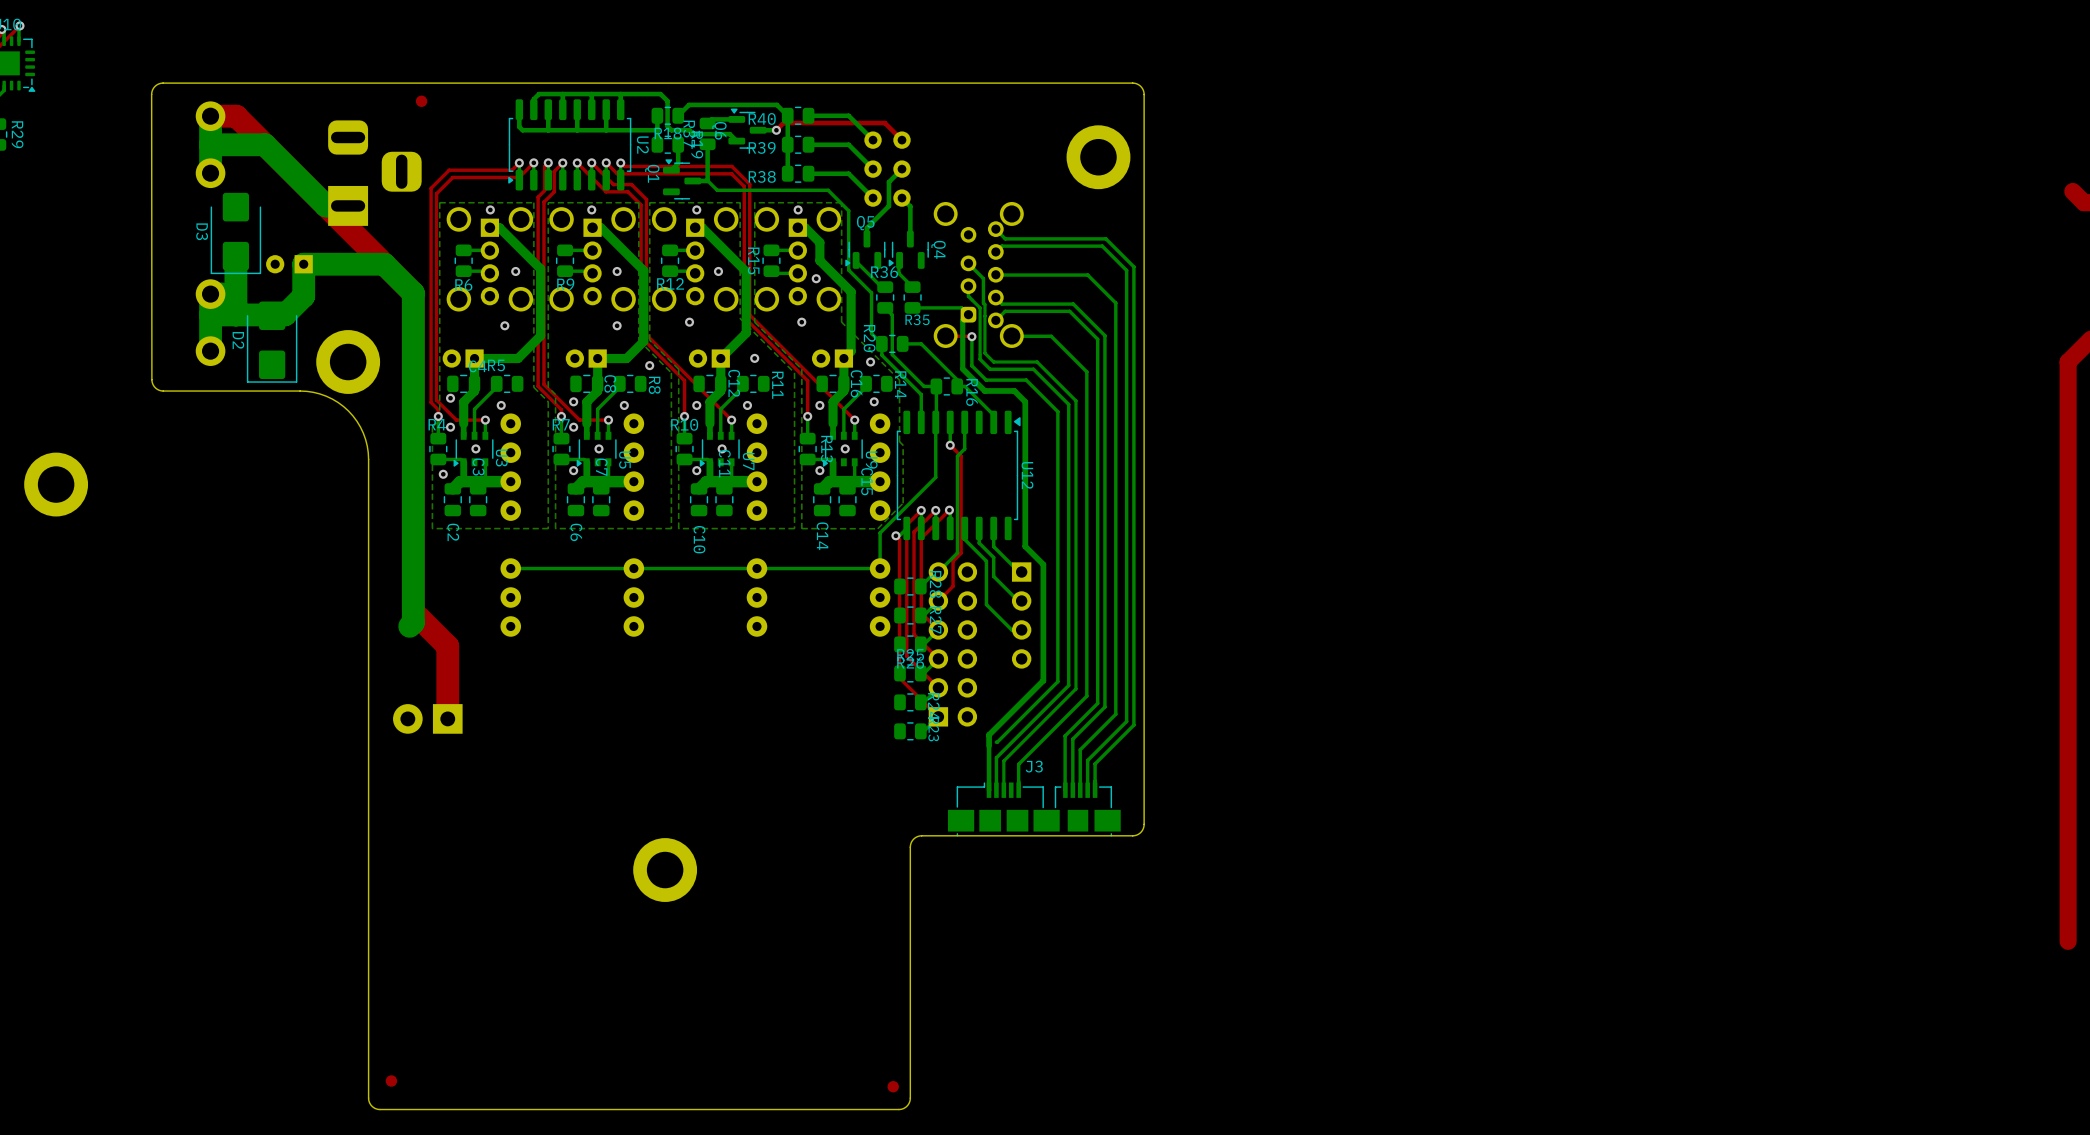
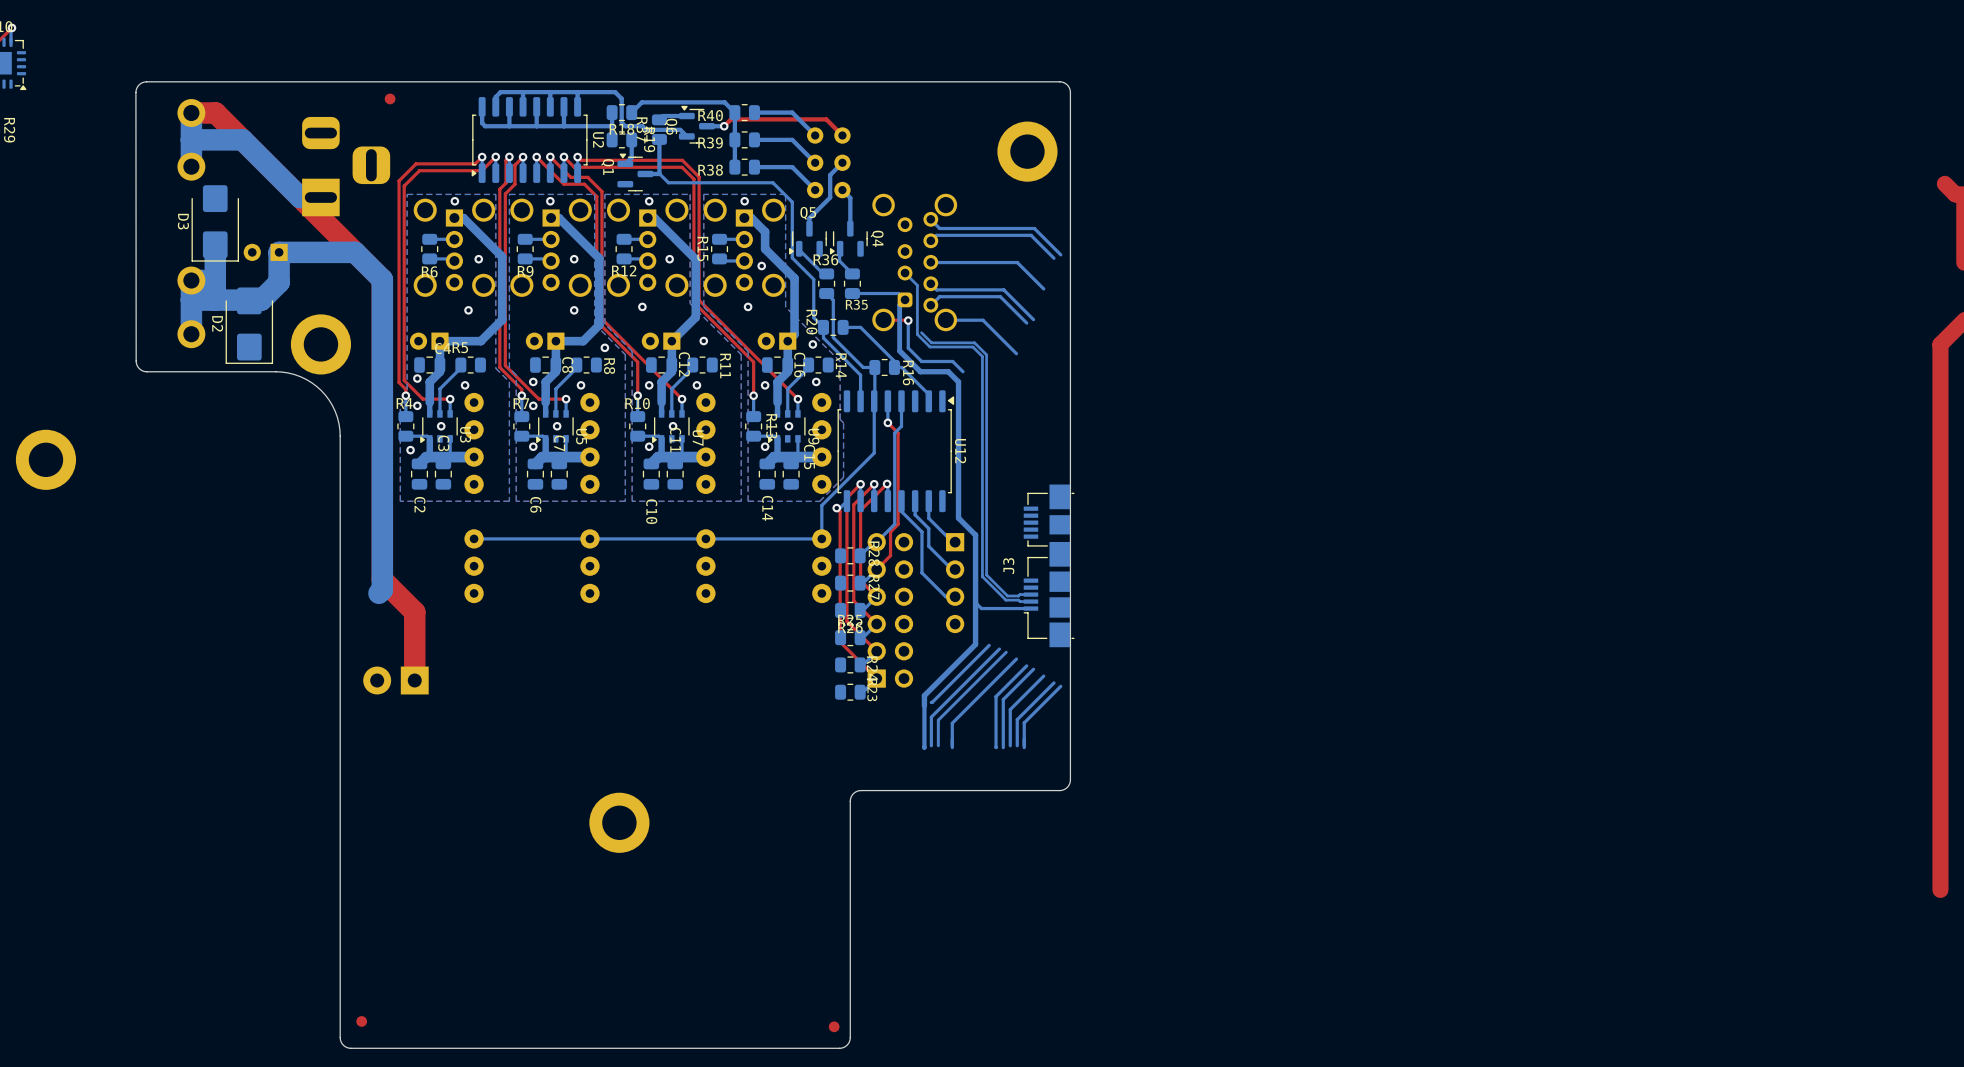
bottom track: (968, 263) (983, 278) (984, 316) -> none
bottom track: (1133, 266) (1133, 725) -> none
bottom track: (1126, 270) (1126, 721) -> none
bottom track: (968, 286) (968, 296) (980, 307) (980, 359) (990, 369) (1033, 369) (1068, 404) (1068, 685) -> (905, 273) (917, 285) (917, 334) (929, 346) (972, 346) (982, 356) (982, 576) (1005, 600) (1030, 601)
bottom track: (1115, 303) (1115, 714) -> none
bottom track: (984, 316) (984, 353) (993, 362) (1037, 362) (1075, 400) (1075, 688) -> none
bottom track: (1104, 335) (1104, 707) -> none
bottom track: (1097, 339) (1097, 703) -> none
bottom track: none -> (921, 332) (931, 342) (974, 342) (986, 354) (986, 574) (1007, 596) (1030, 594)
bottom track: (1086, 371) (1086, 696) -> none
bottom track: (1019, 380) (1026, 380) (1057, 411) (1057, 681) -> (952, 361) (963, 371)
bottom track: none -> (975, 602) (981, 608) (1030, 608)
J3 rotation: 0° (1034, 809) -> 90° counterclockwise (1049, 565)
J3 position: (1034, 809) -> (1049, 565)

